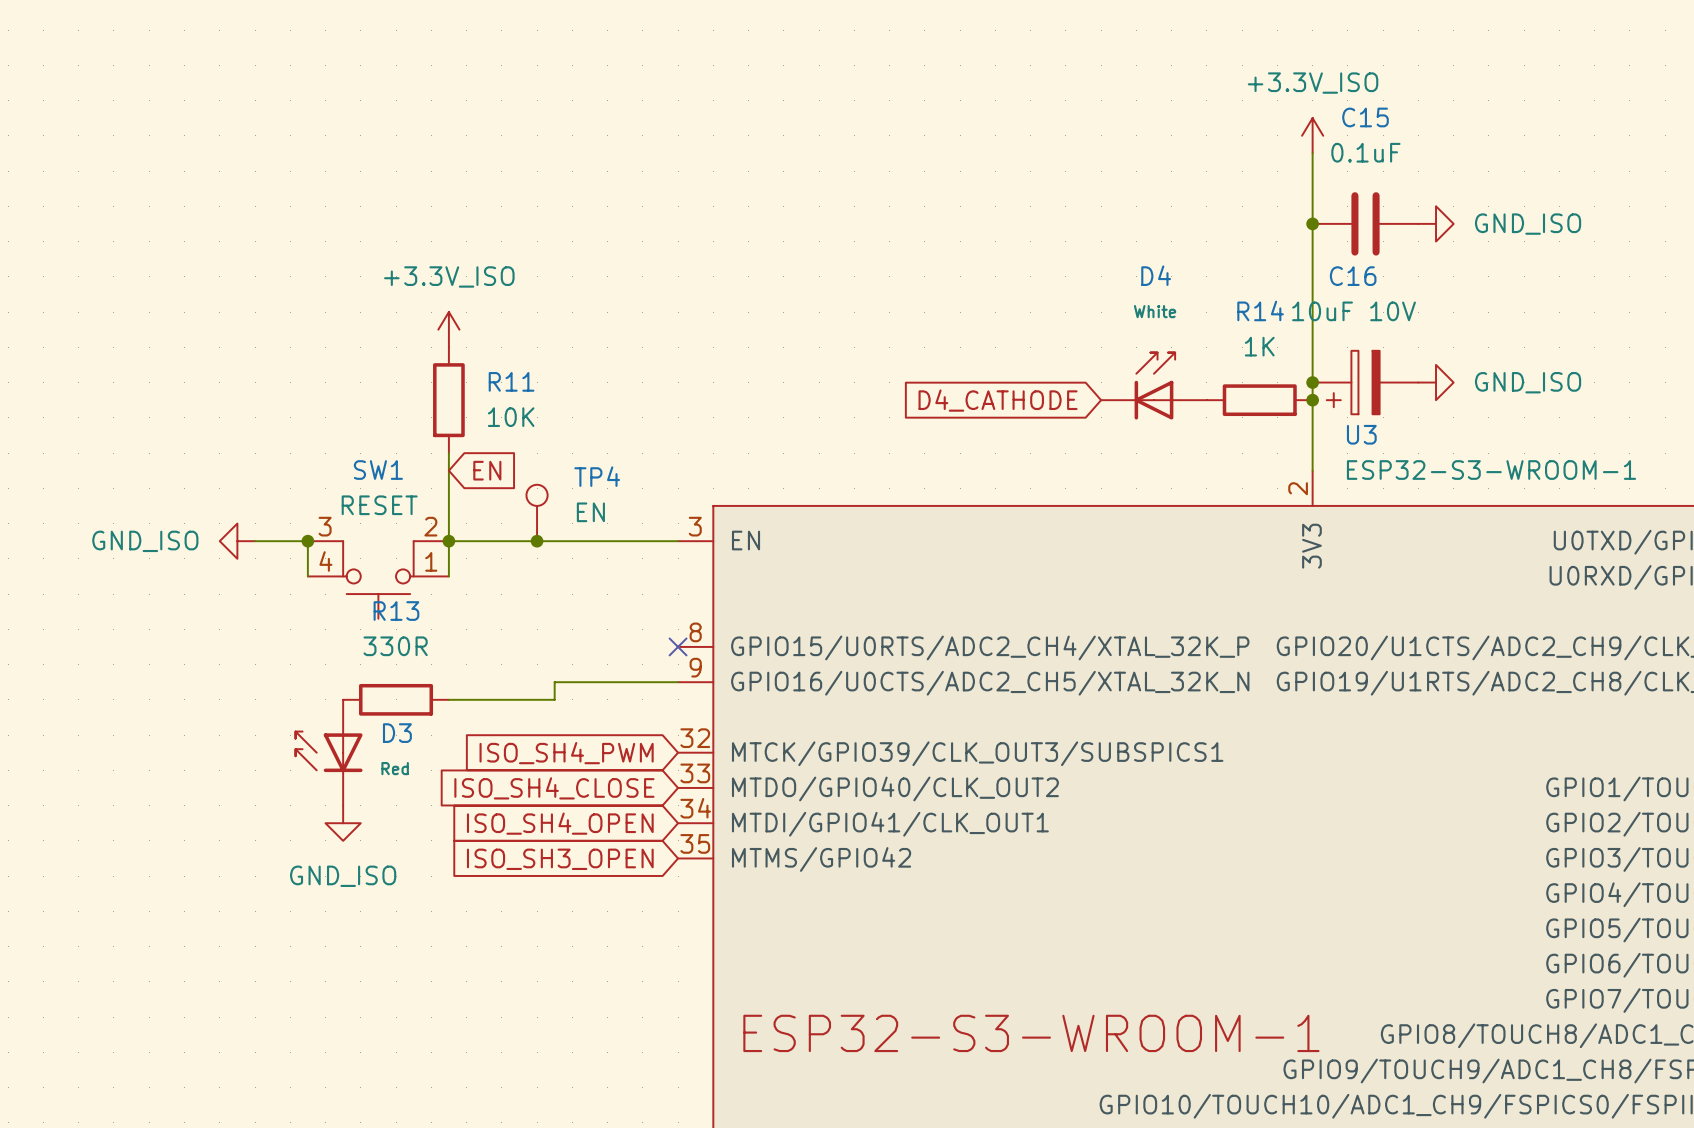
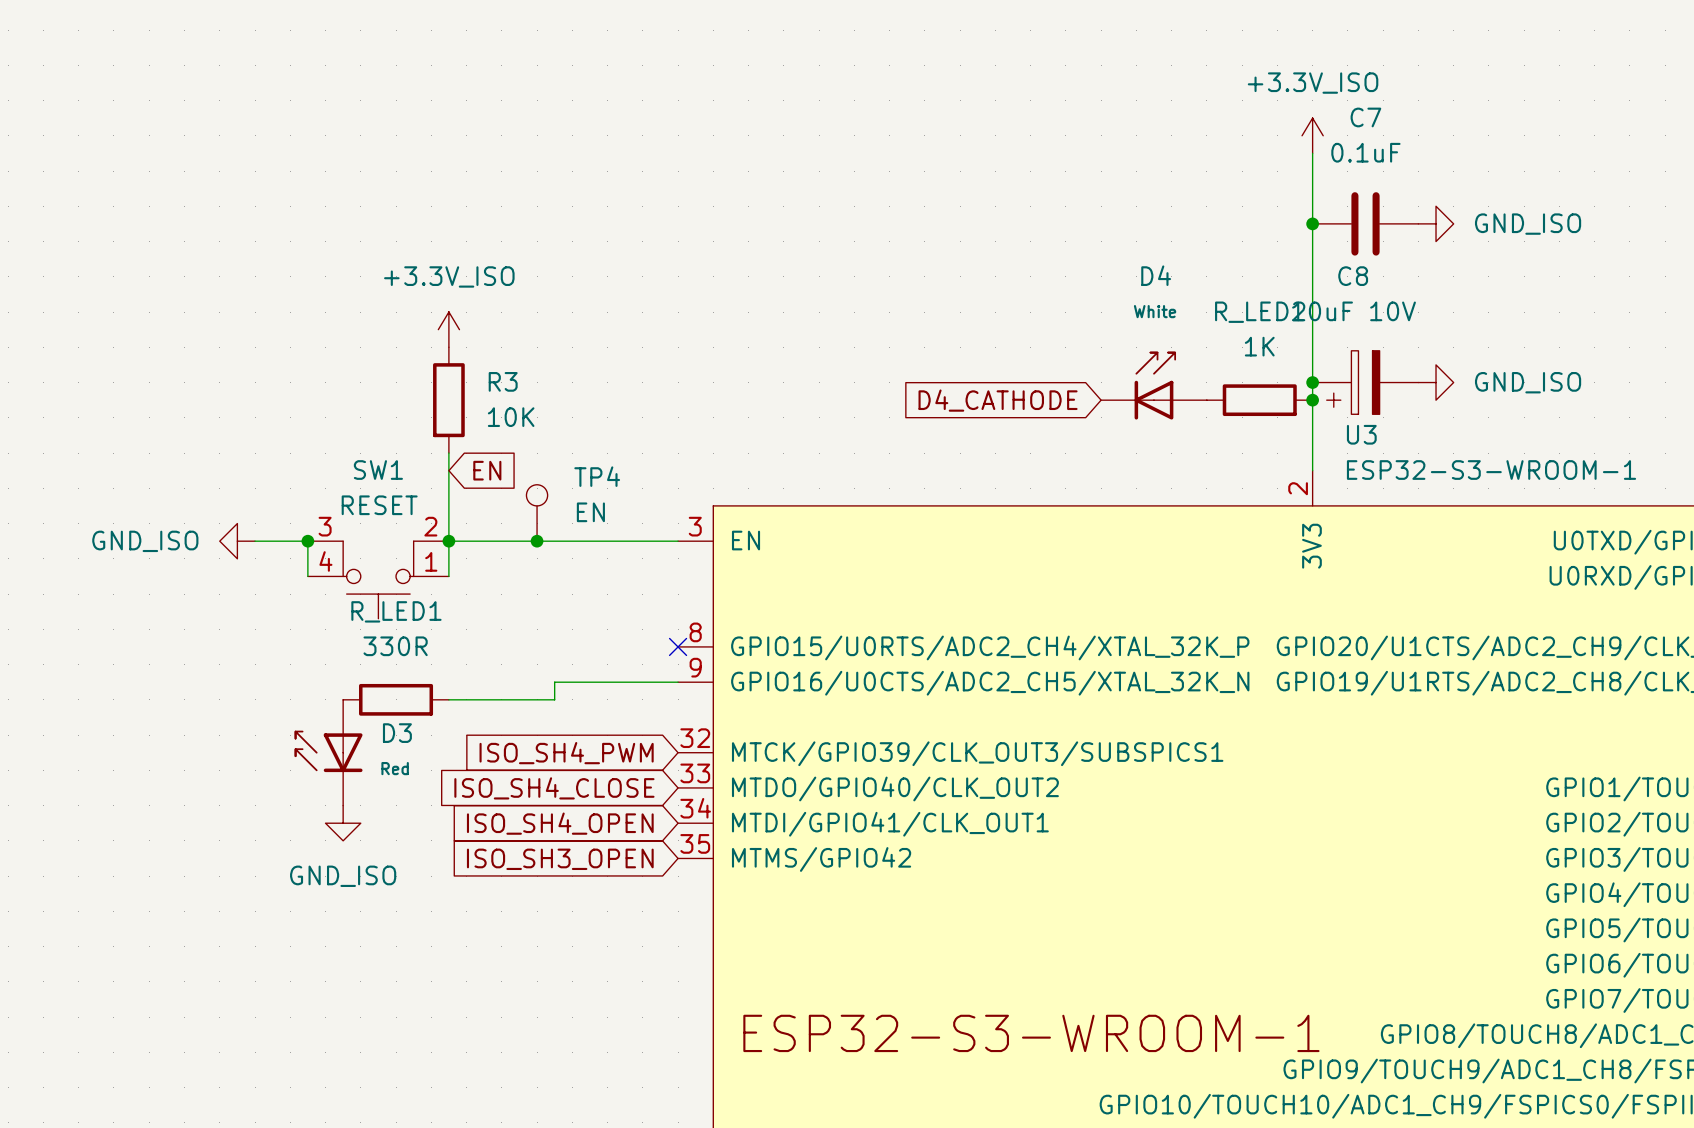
C15 name: C15 (1365, 117) -> C7 (1365, 117)
C16 name: C16 (1353, 276) -> C8 (1353, 276)
R14 name: R14 (1260, 310) -> R_LED2 (1260, 312)
R11 name: R11 (511, 381) -> R3 (503, 381)
R13 name: R13 (396, 611) -> R_LED1 (396, 611)

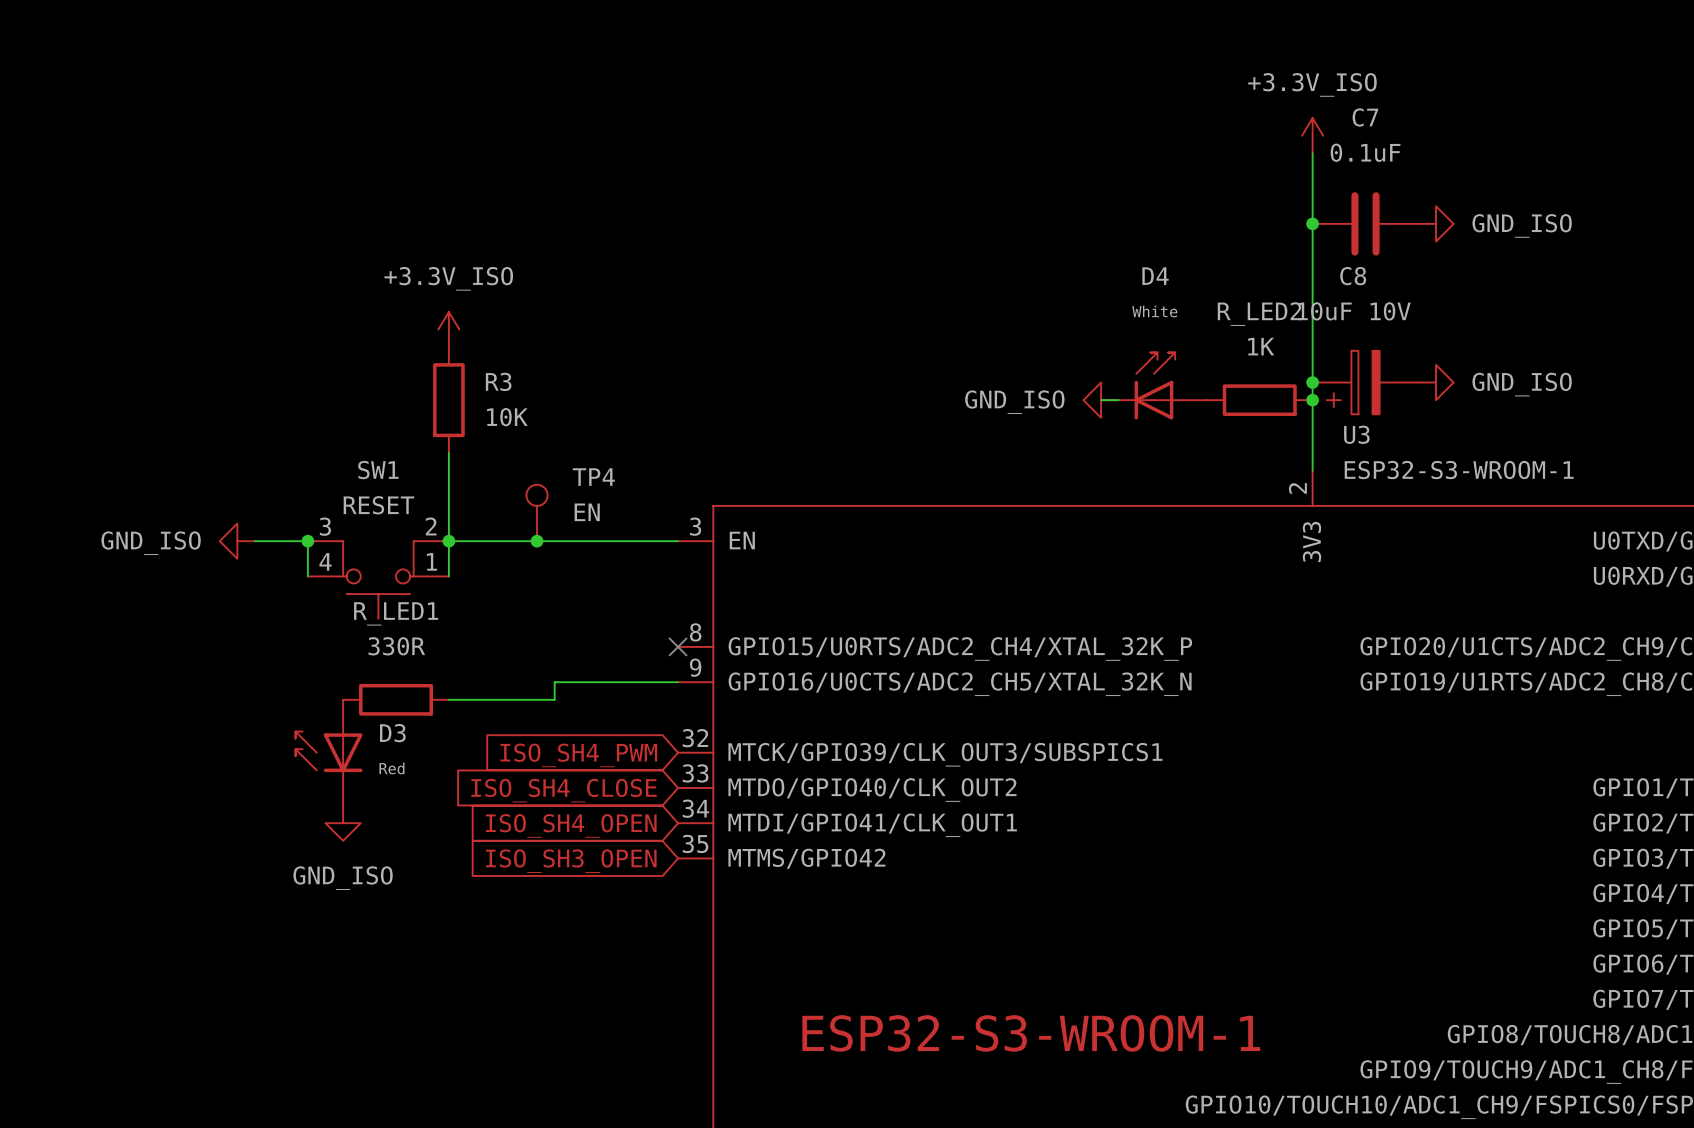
global label: D4_CATHODE (998, 400) -> none
power symbol: none -> GND_ISO (1101, 400)
global label: EN (487, 470) -> none

